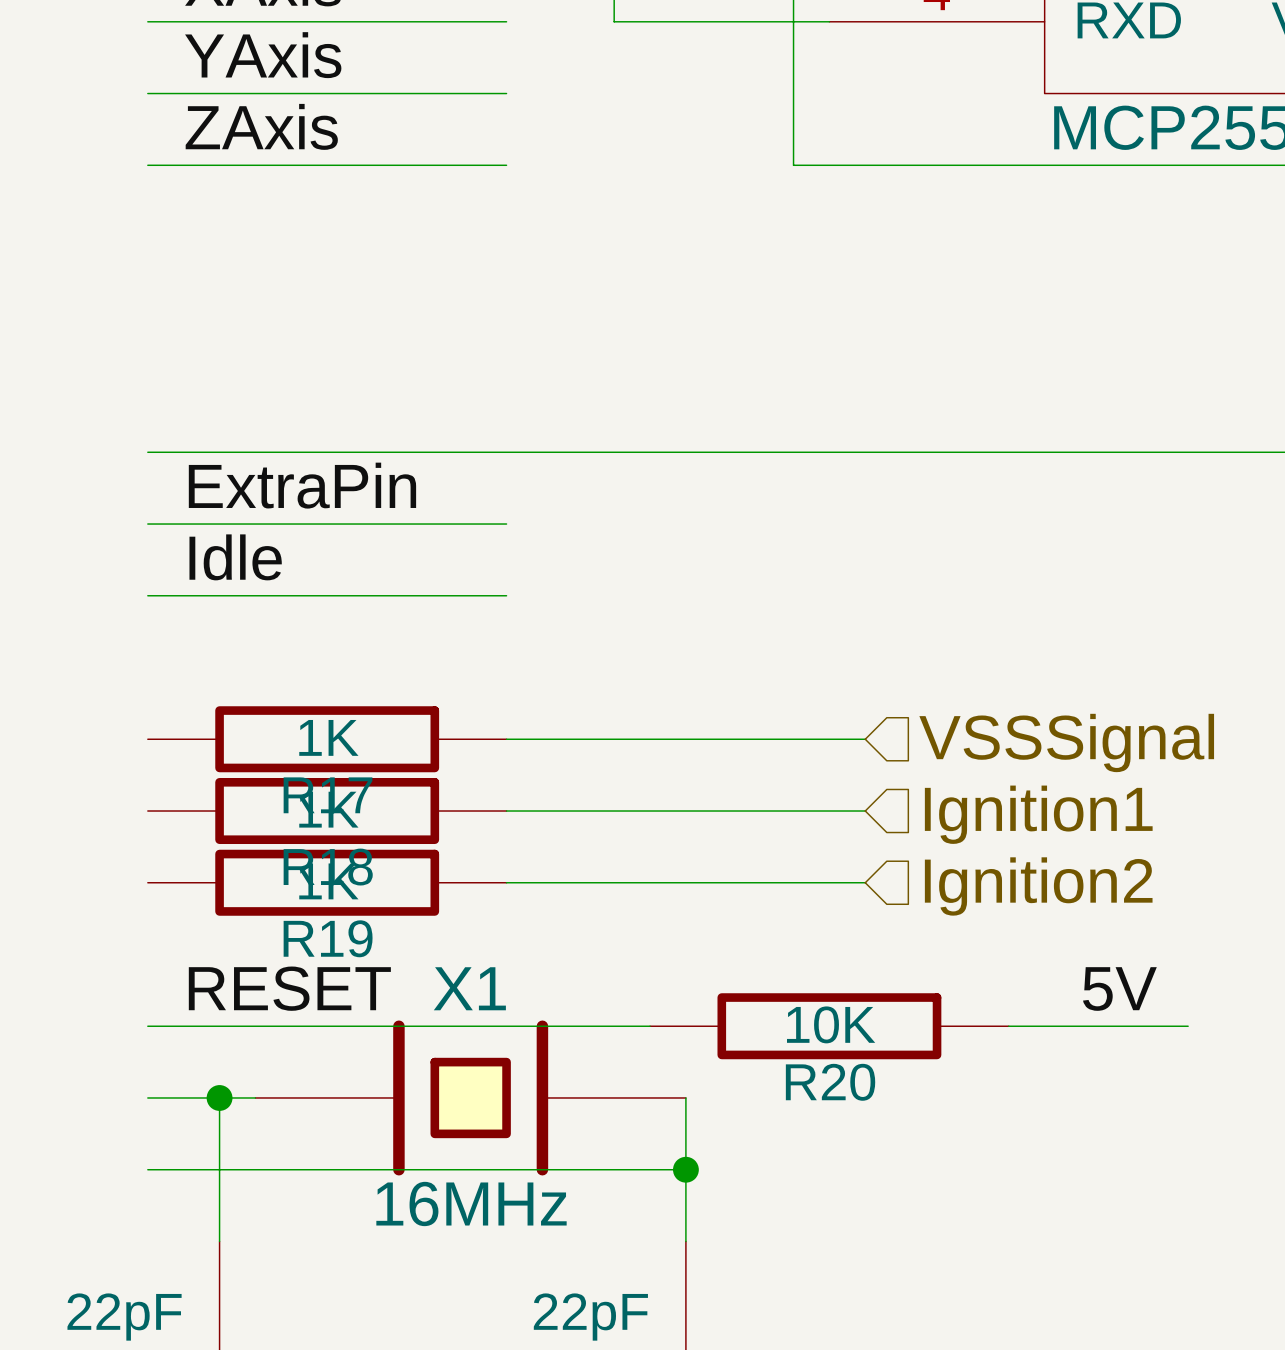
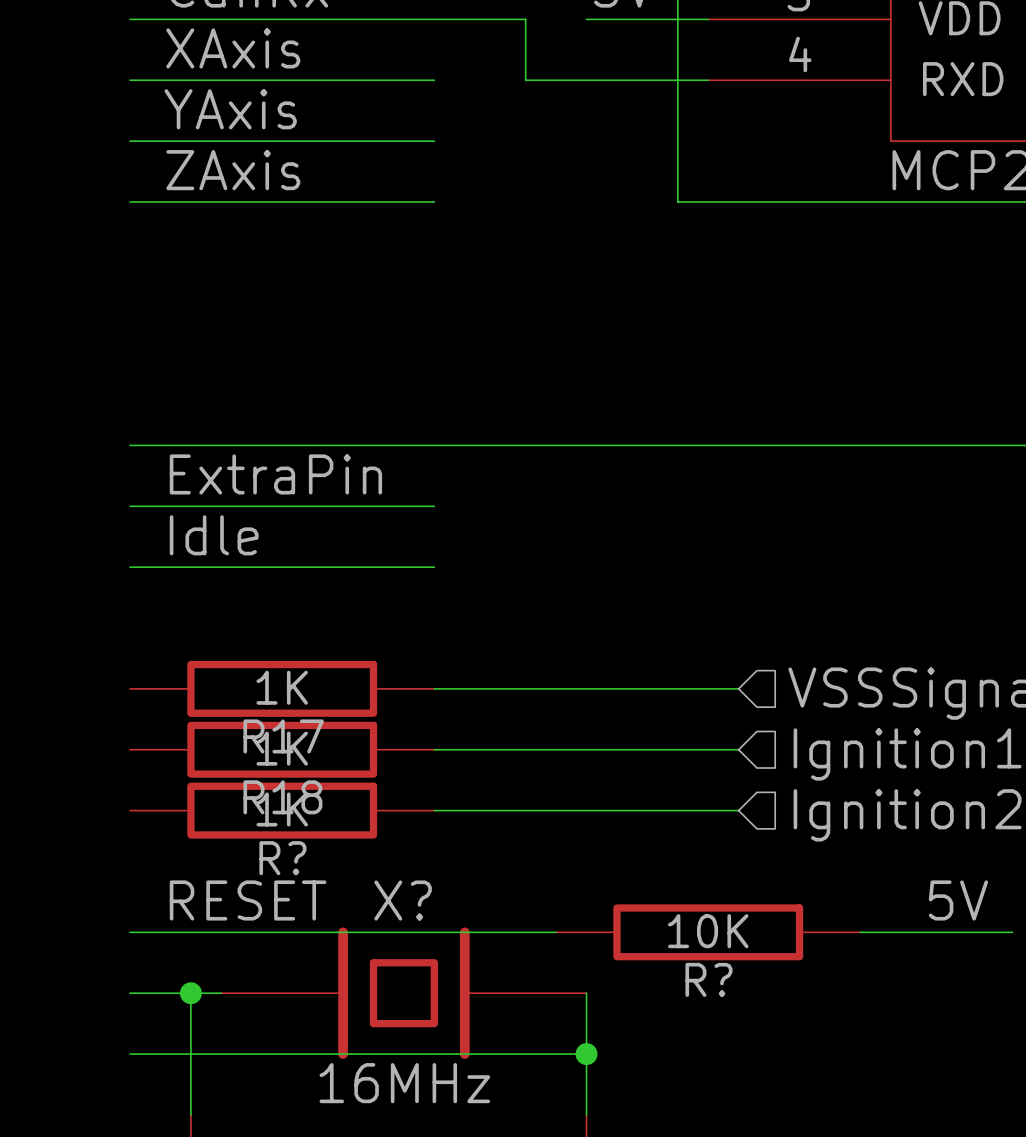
R19 name: R19 (328, 938) -> R? (282, 858)
X1 name: X1 (469, 988) -> X? (403, 900)
R20 name: R20 (830, 1082) -> R? (708, 979)

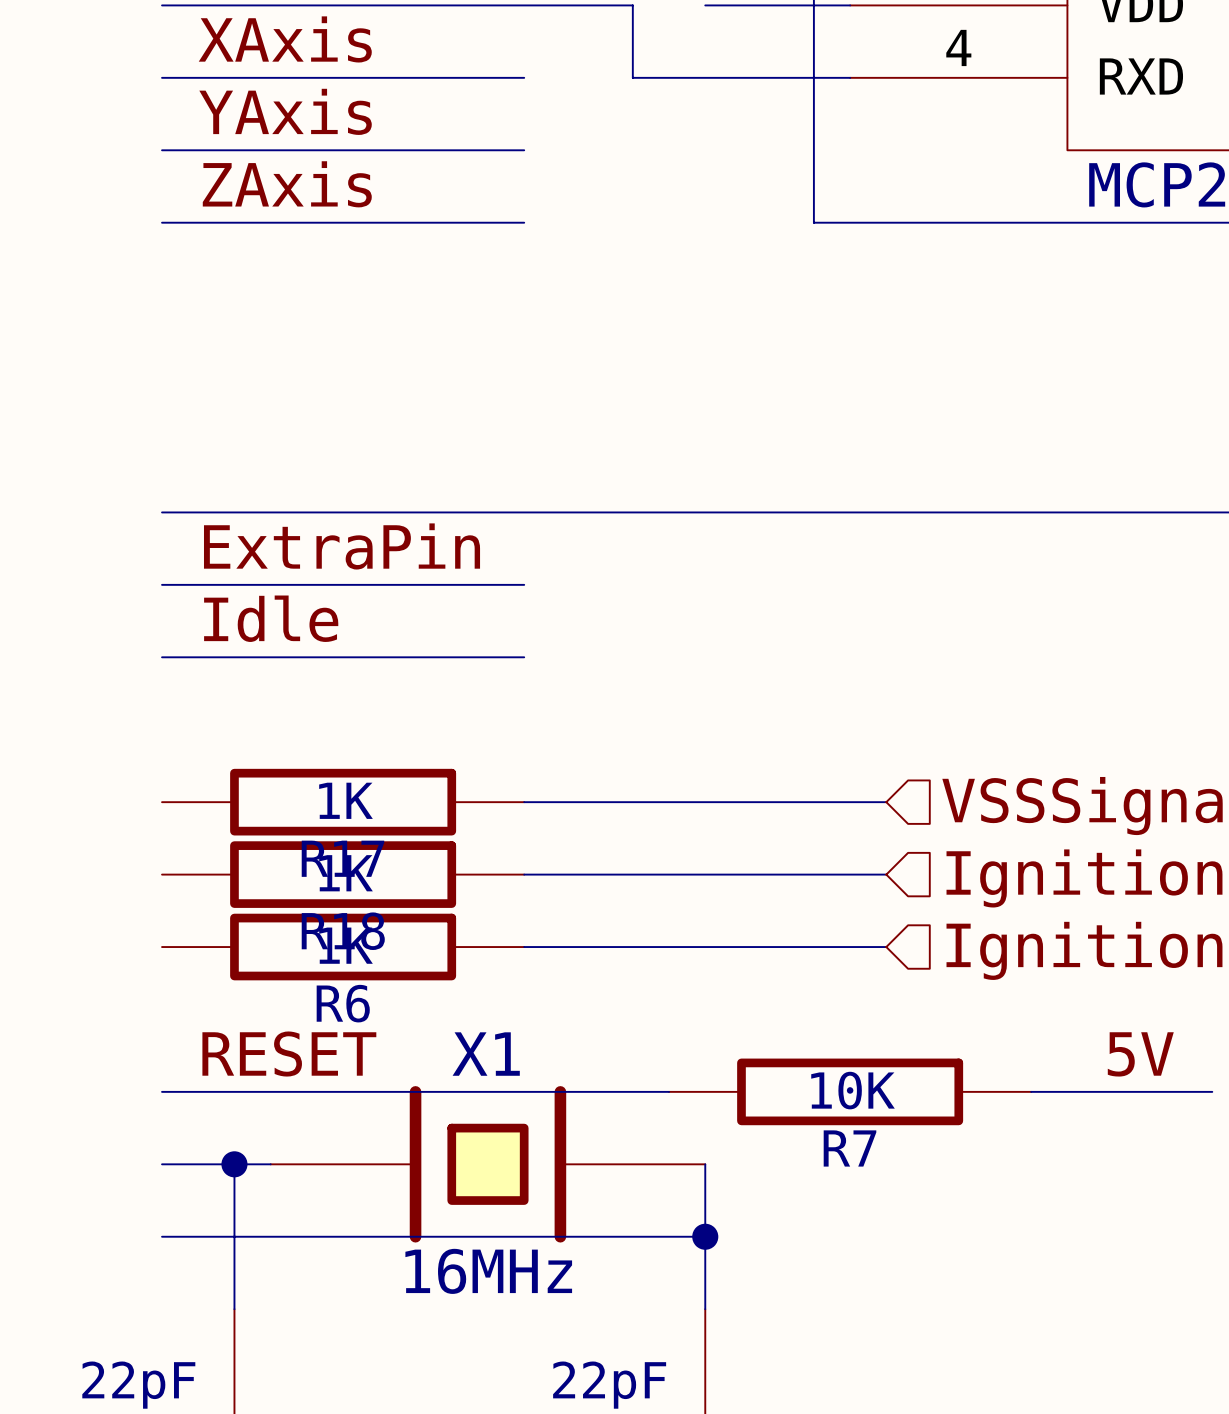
R? name: R? (282, 858) -> R6 (343, 1003)
X? name: X? (403, 900) -> X1 (486, 1054)
R? name: R? (708, 979) -> R7 (849, 1148)

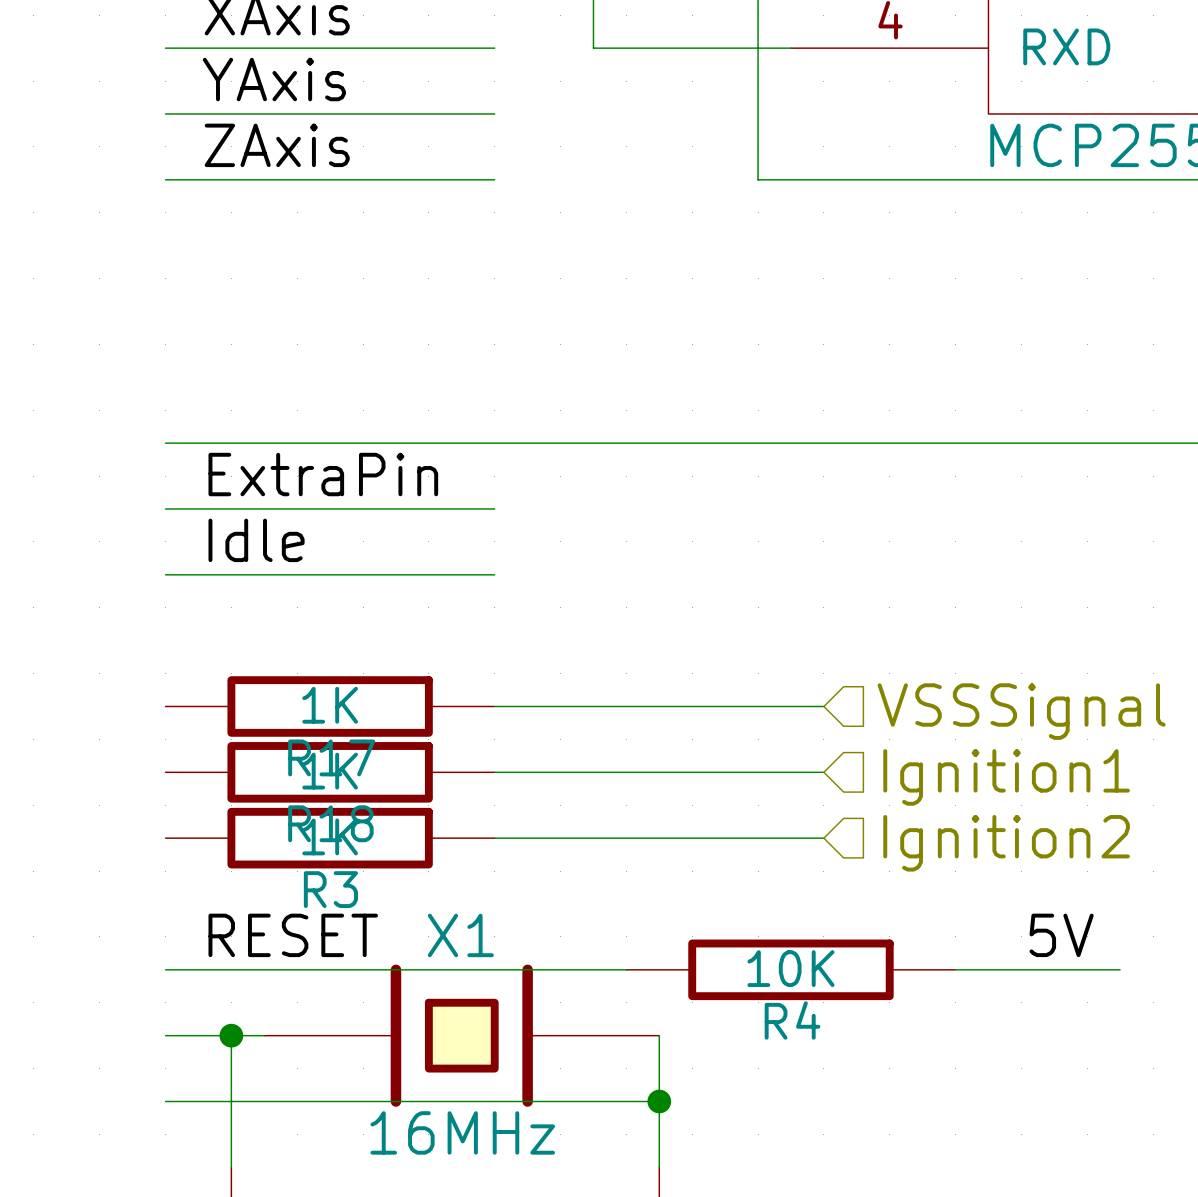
R6 name: R6 (343, 1003) -> R3 (330, 889)
R7 name: R7 (849, 1148) -> R4 (792, 1020)

